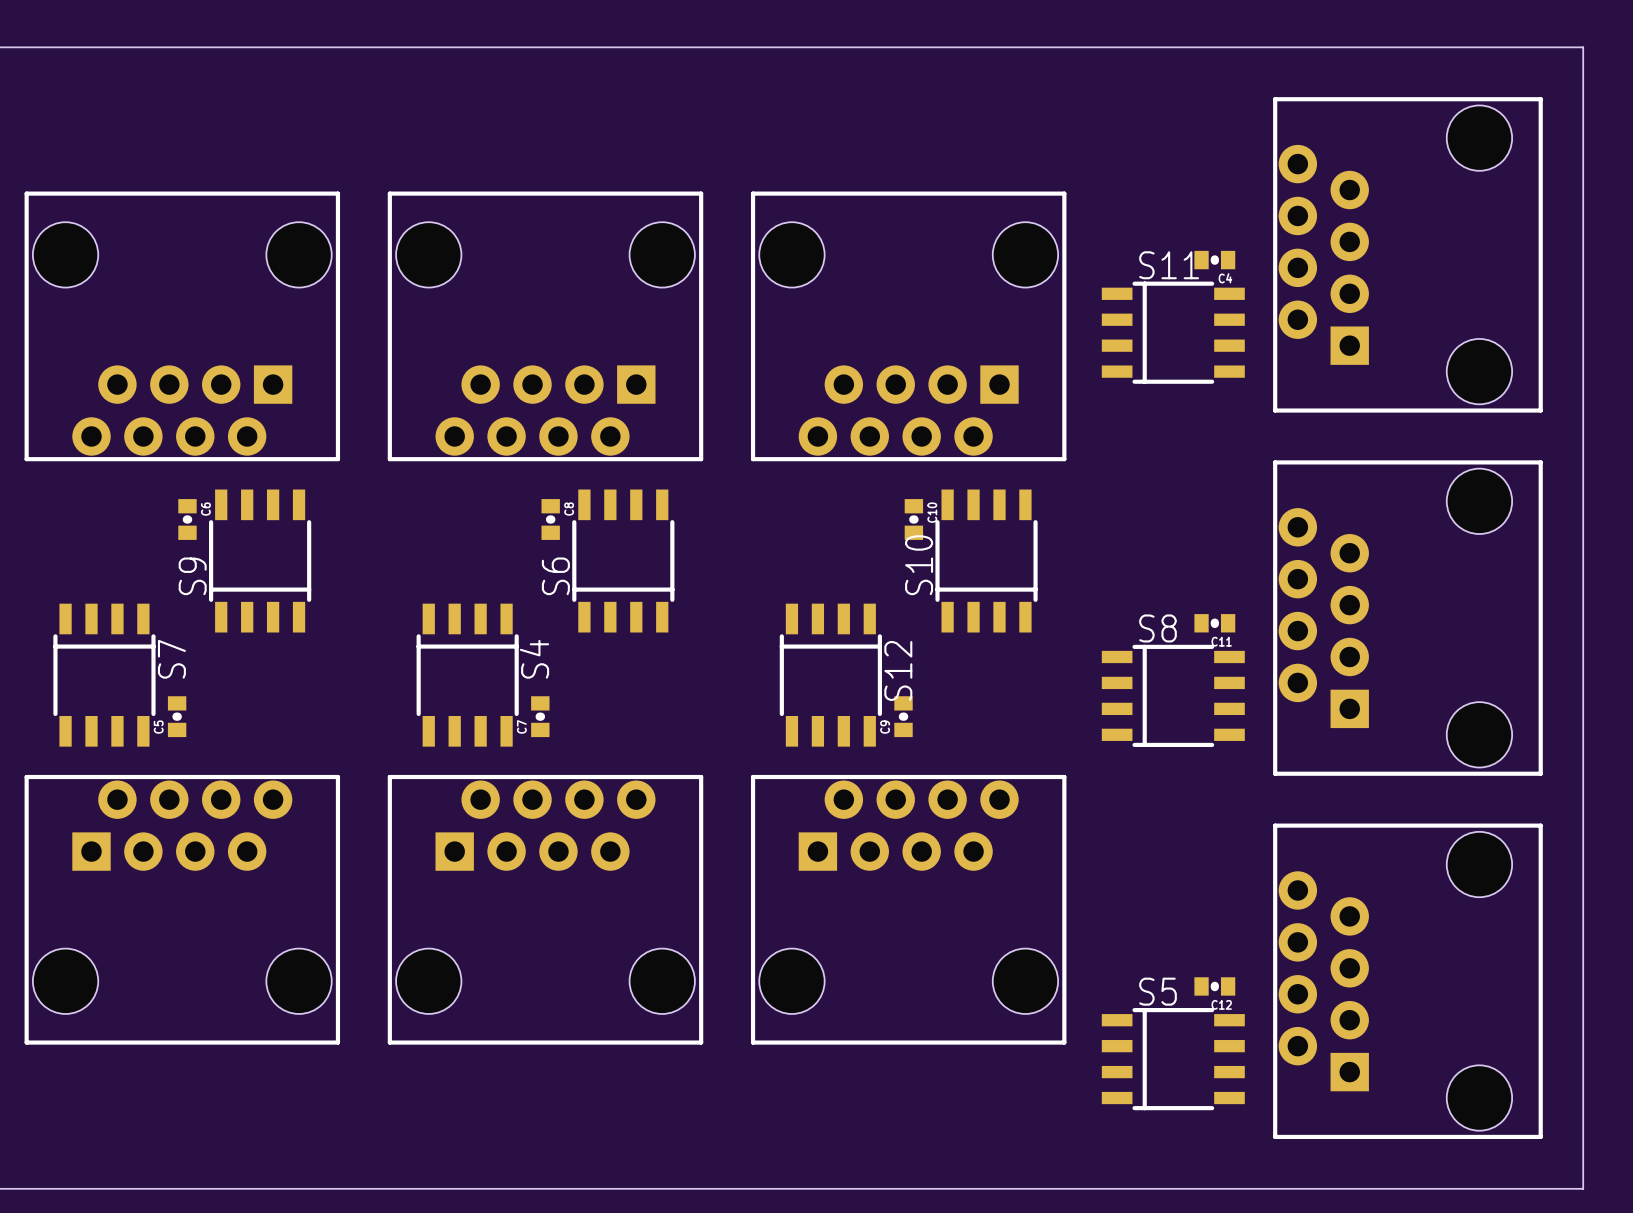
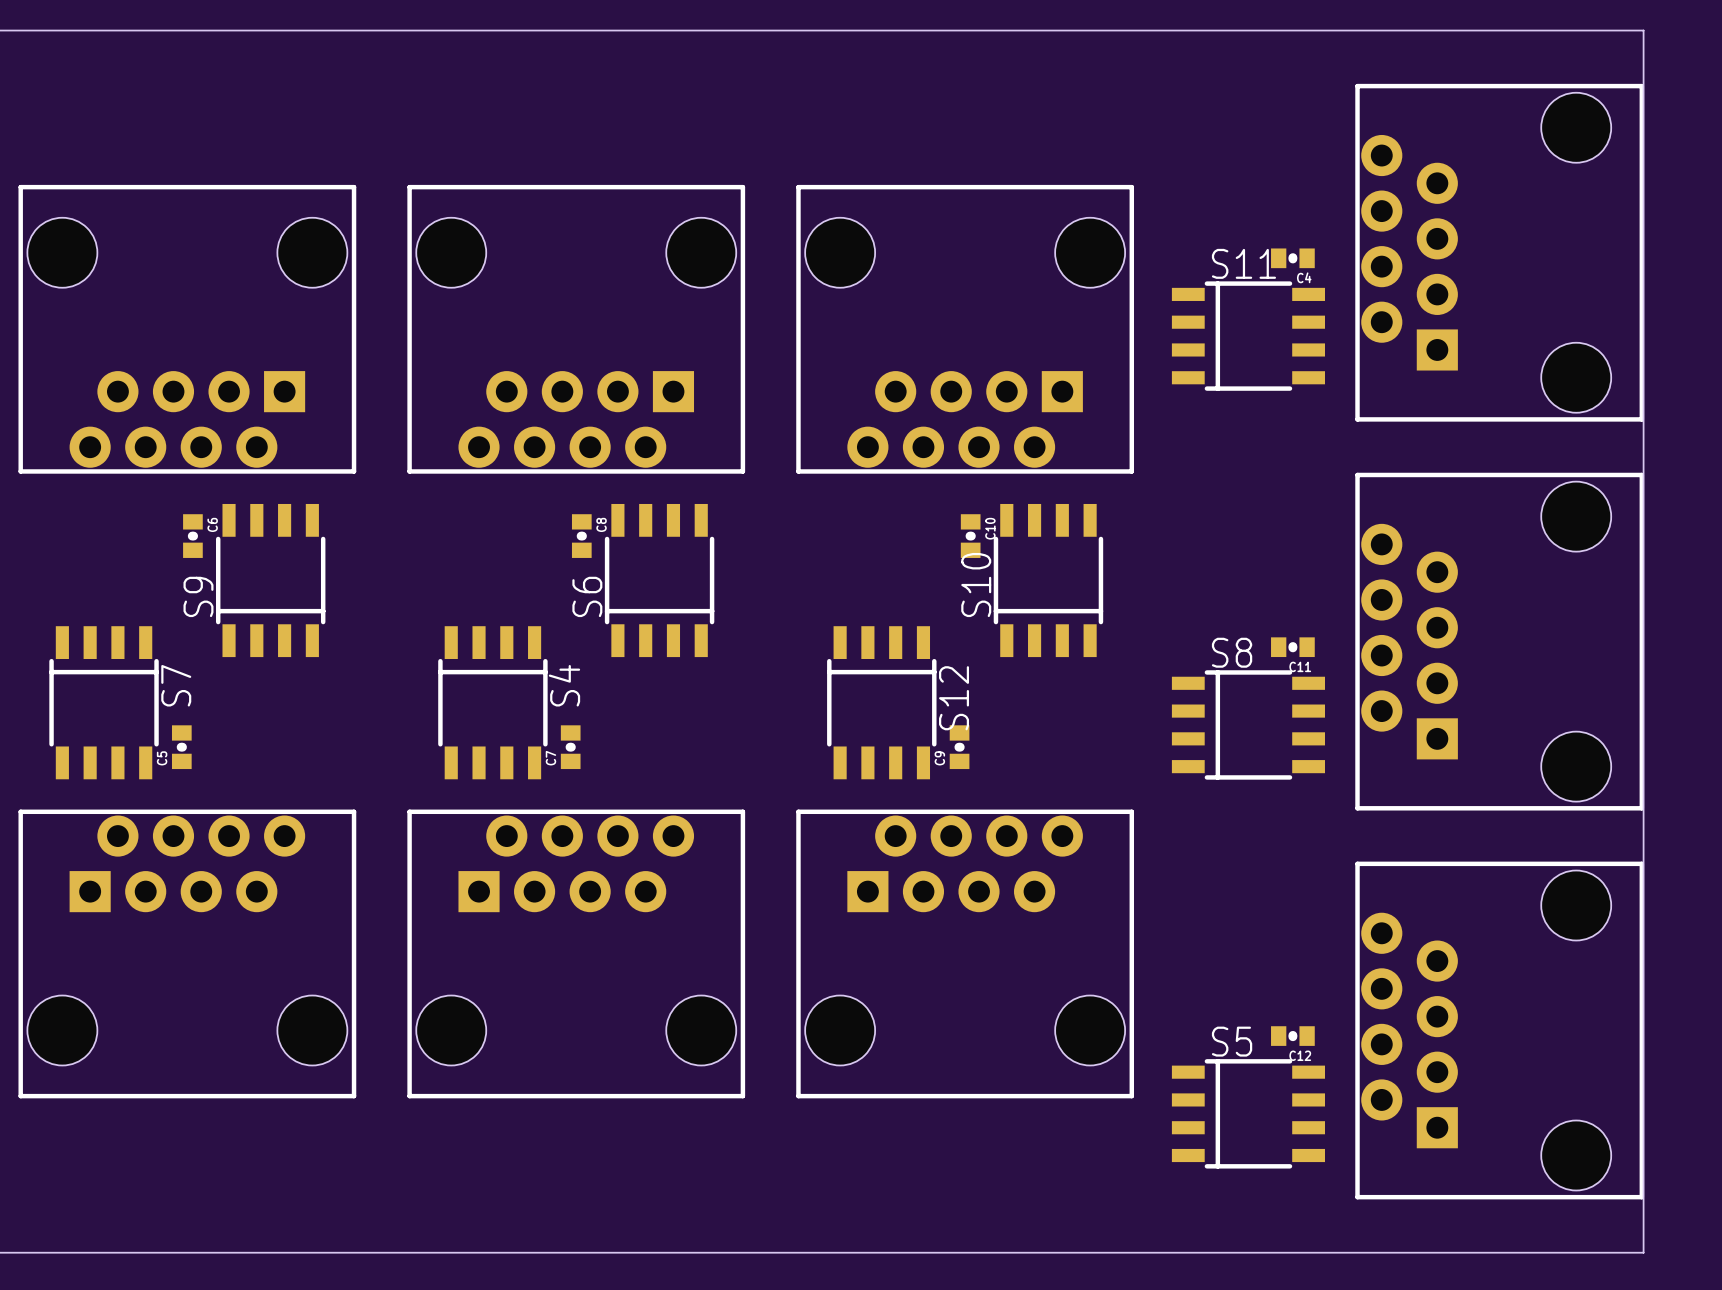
board edge: (1542, 47) (1583, 47) (1583, 1188) (1542, 1188) -> (1643, 30) (1643, 1252)

